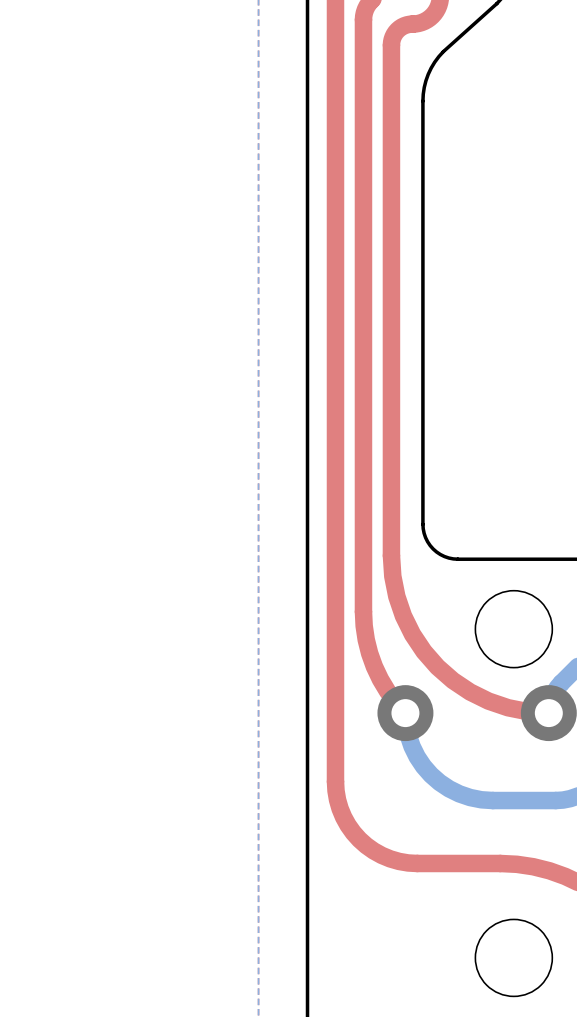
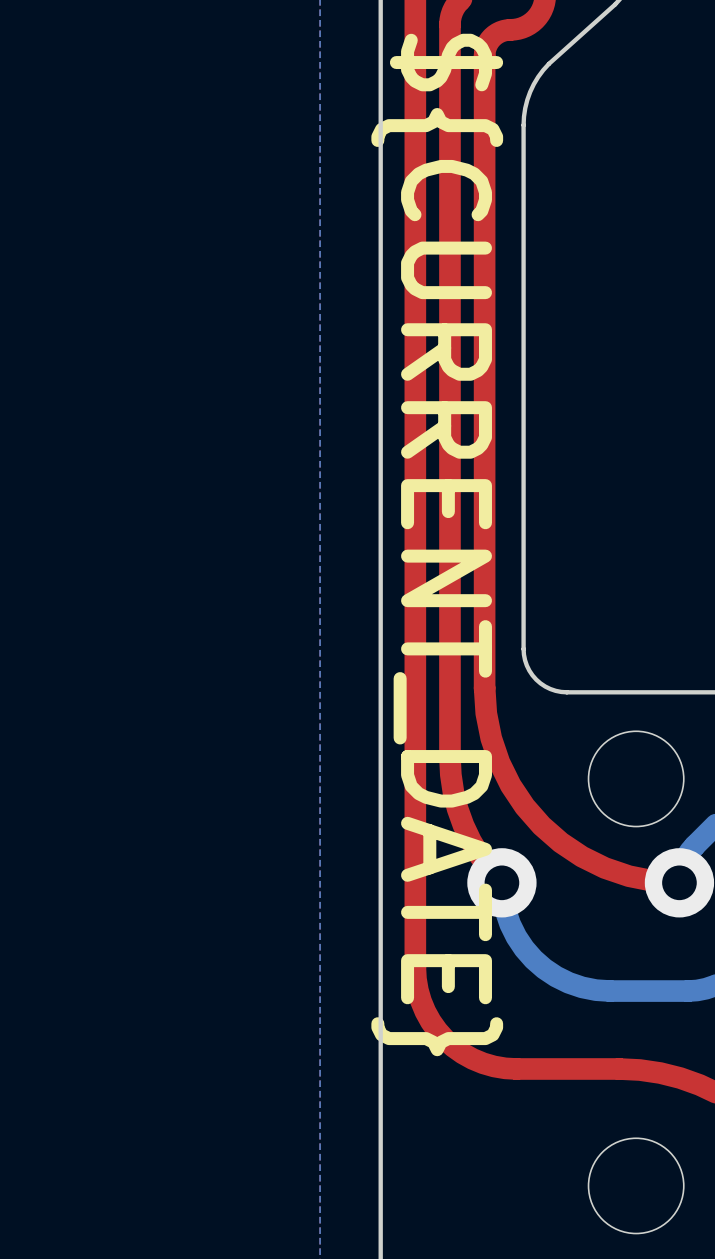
text: none -> ${CURRENT_DATE} (437, 544)

